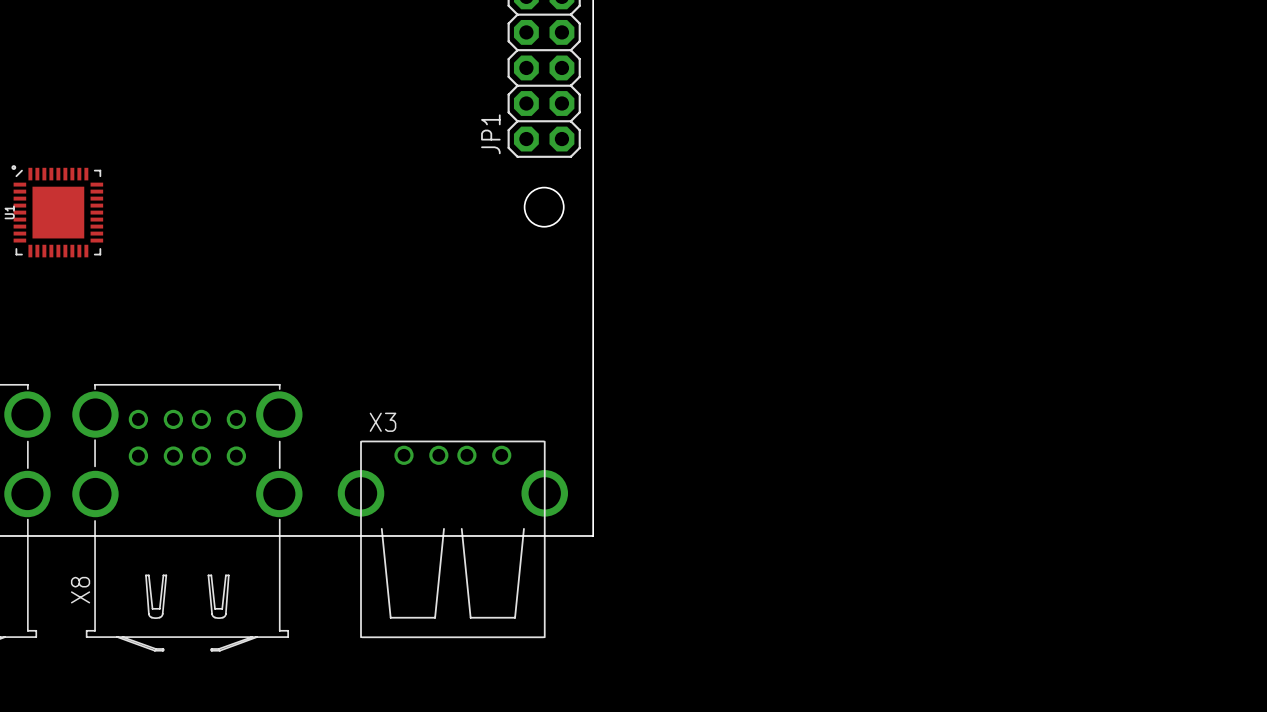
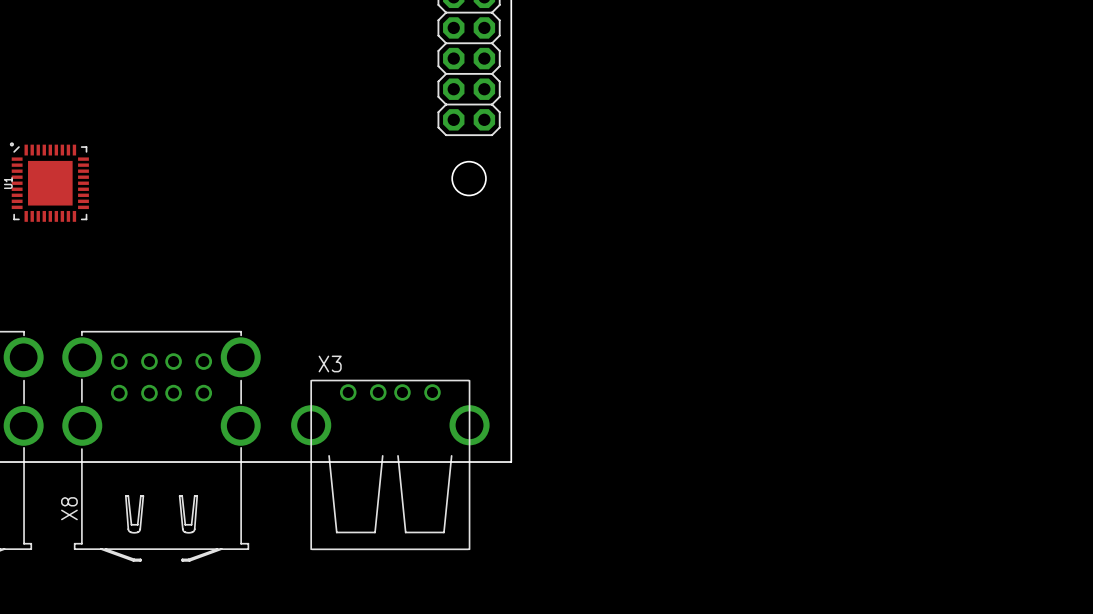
JP1 name: JP1 (490, 134) -> none

